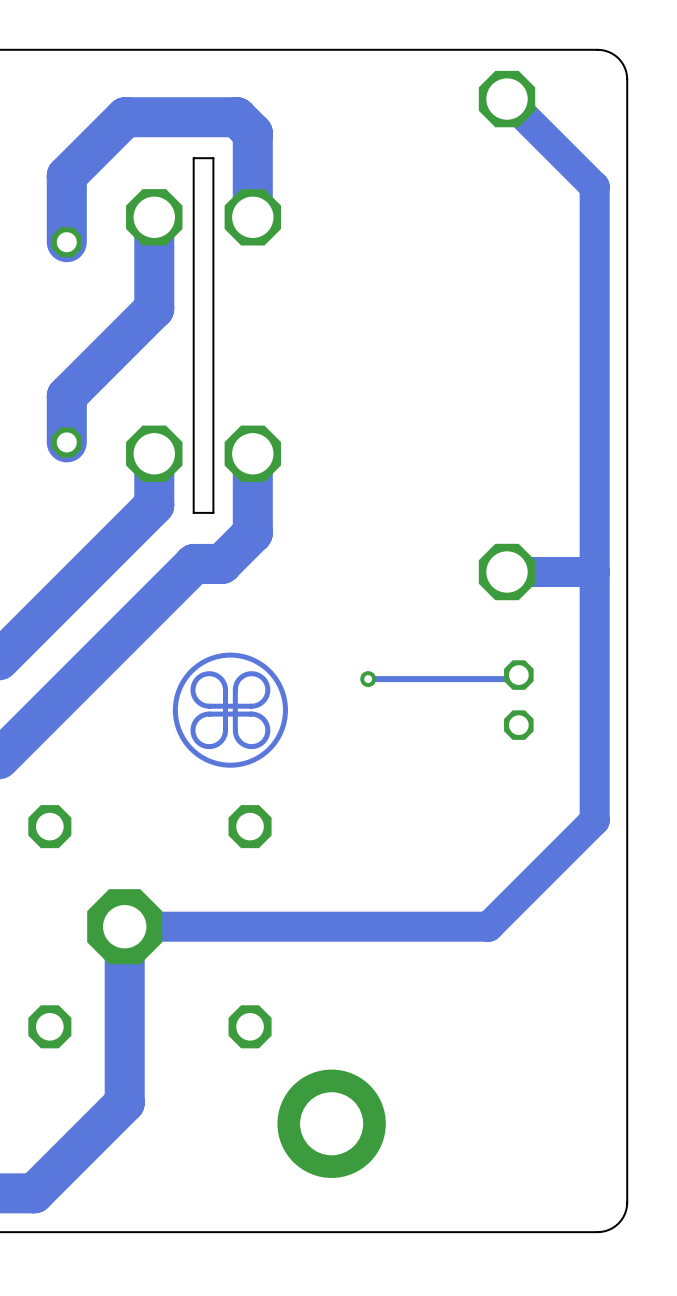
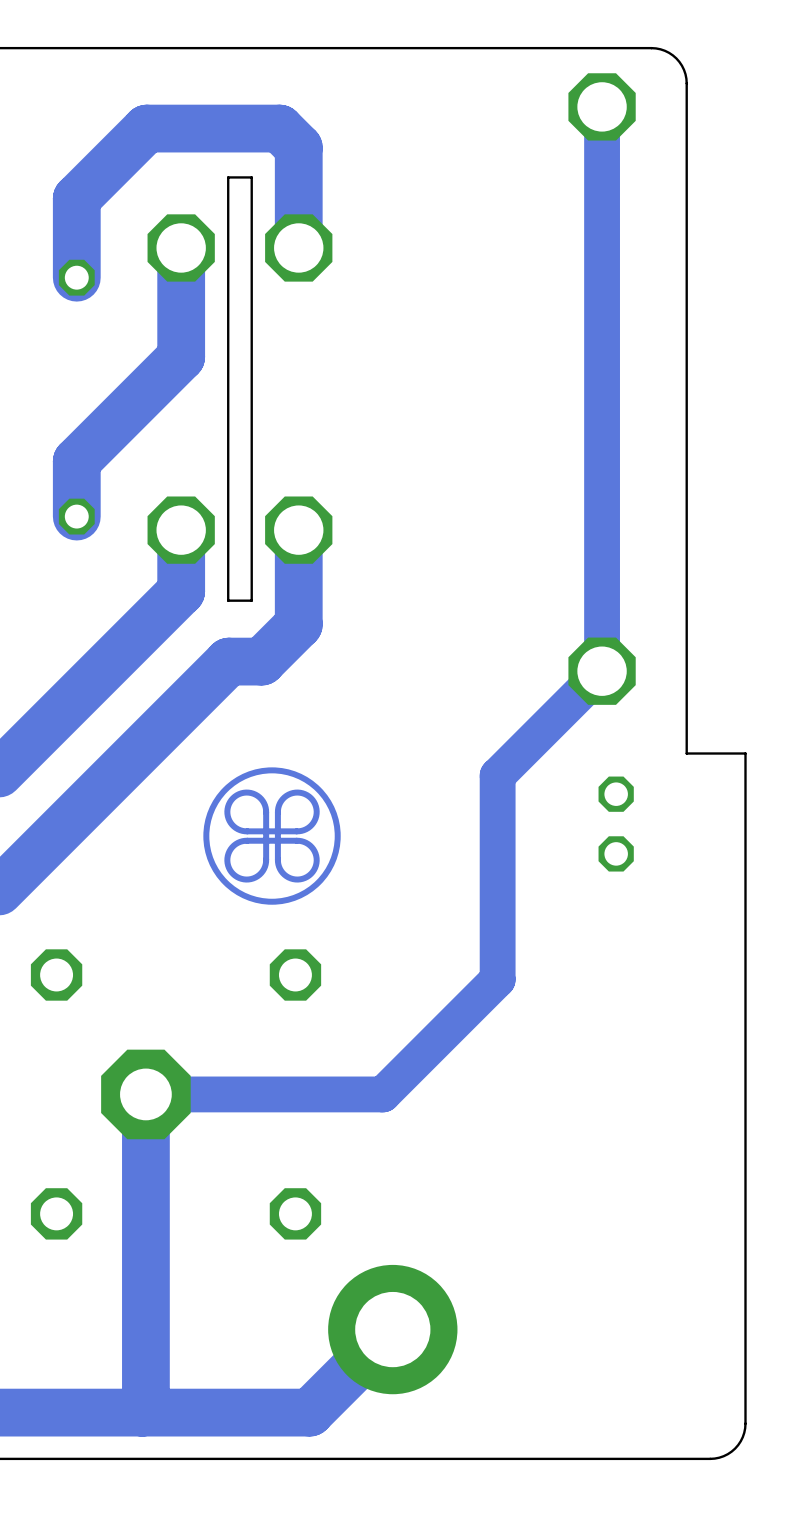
board edge: (548, 49) (605, 50) (618, 58) (624, 68) (626, 75) (627, 640) -> (651, 48) (664, 50) (676, 58) (684, 69) (686, 83) (686, 753) (745, 753)
track: (507, 99) (594, 186) (594, 820) (488, 926) (323, 926) -> (602, 106) (602, 671) (497, 775) (497, 979) (382, 1094)
track: (594, 572) (507, 572) -> none
track: (518, 675) (514, 679) (368, 679) -> none
via: (368, 679) -> none
track: (124, 1102) (34, 1193) -> (145, 1304) (145, 1408) (142, 1412)
track: none -> (392, 1329) (309, 1412) (37, 1412)

